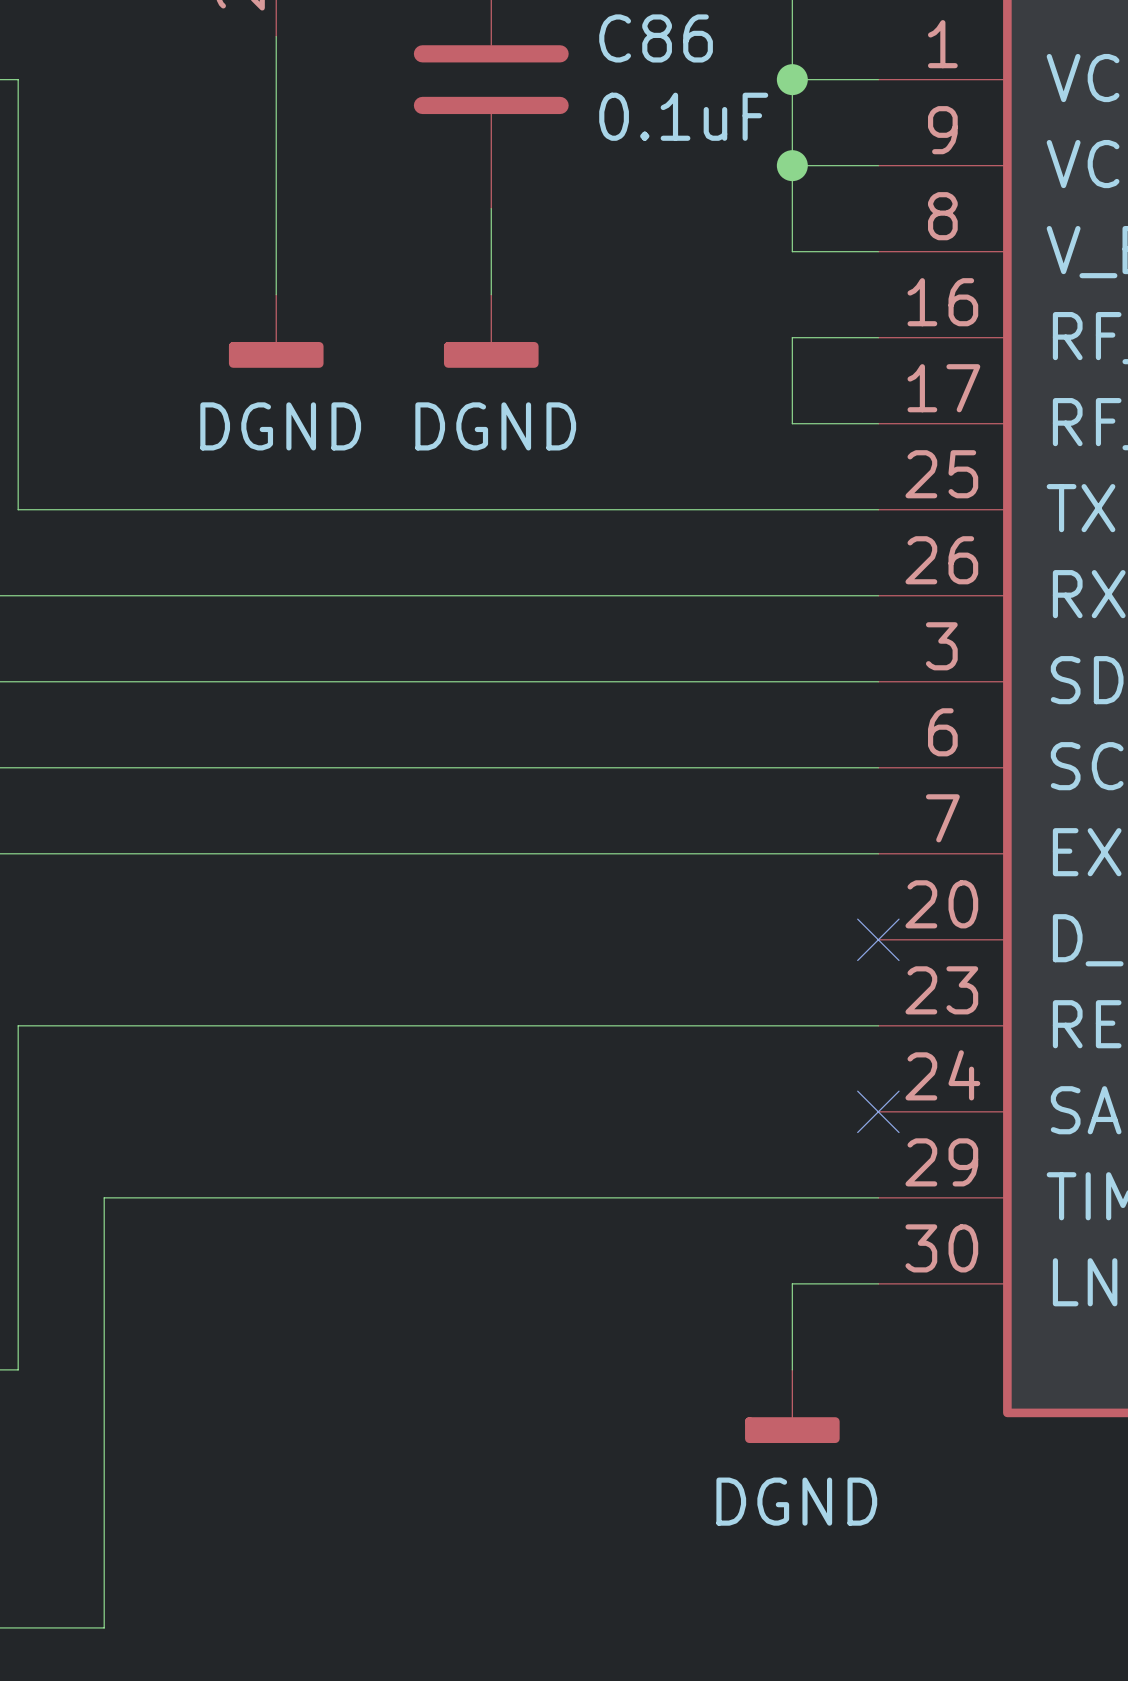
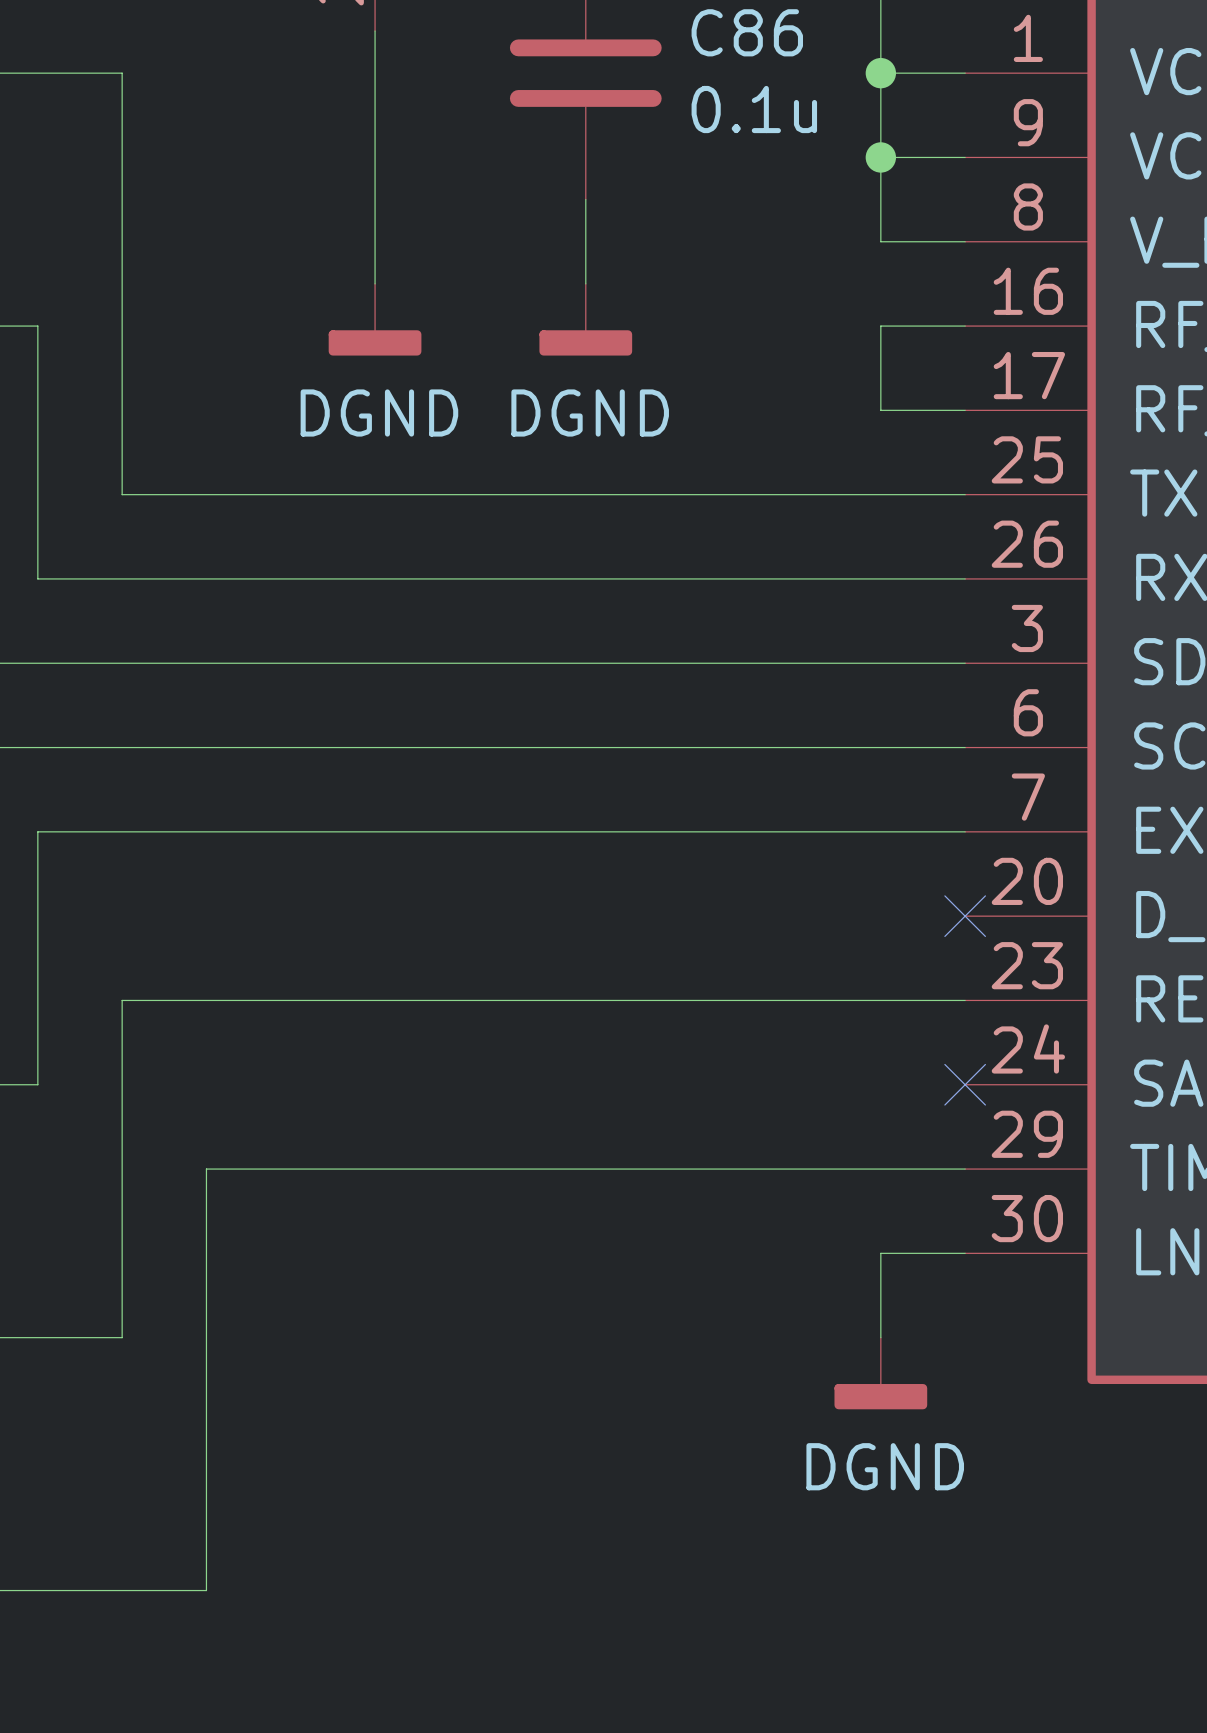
C86 value: 0.1uF (683, 116) -> 0.1u (754, 109)

